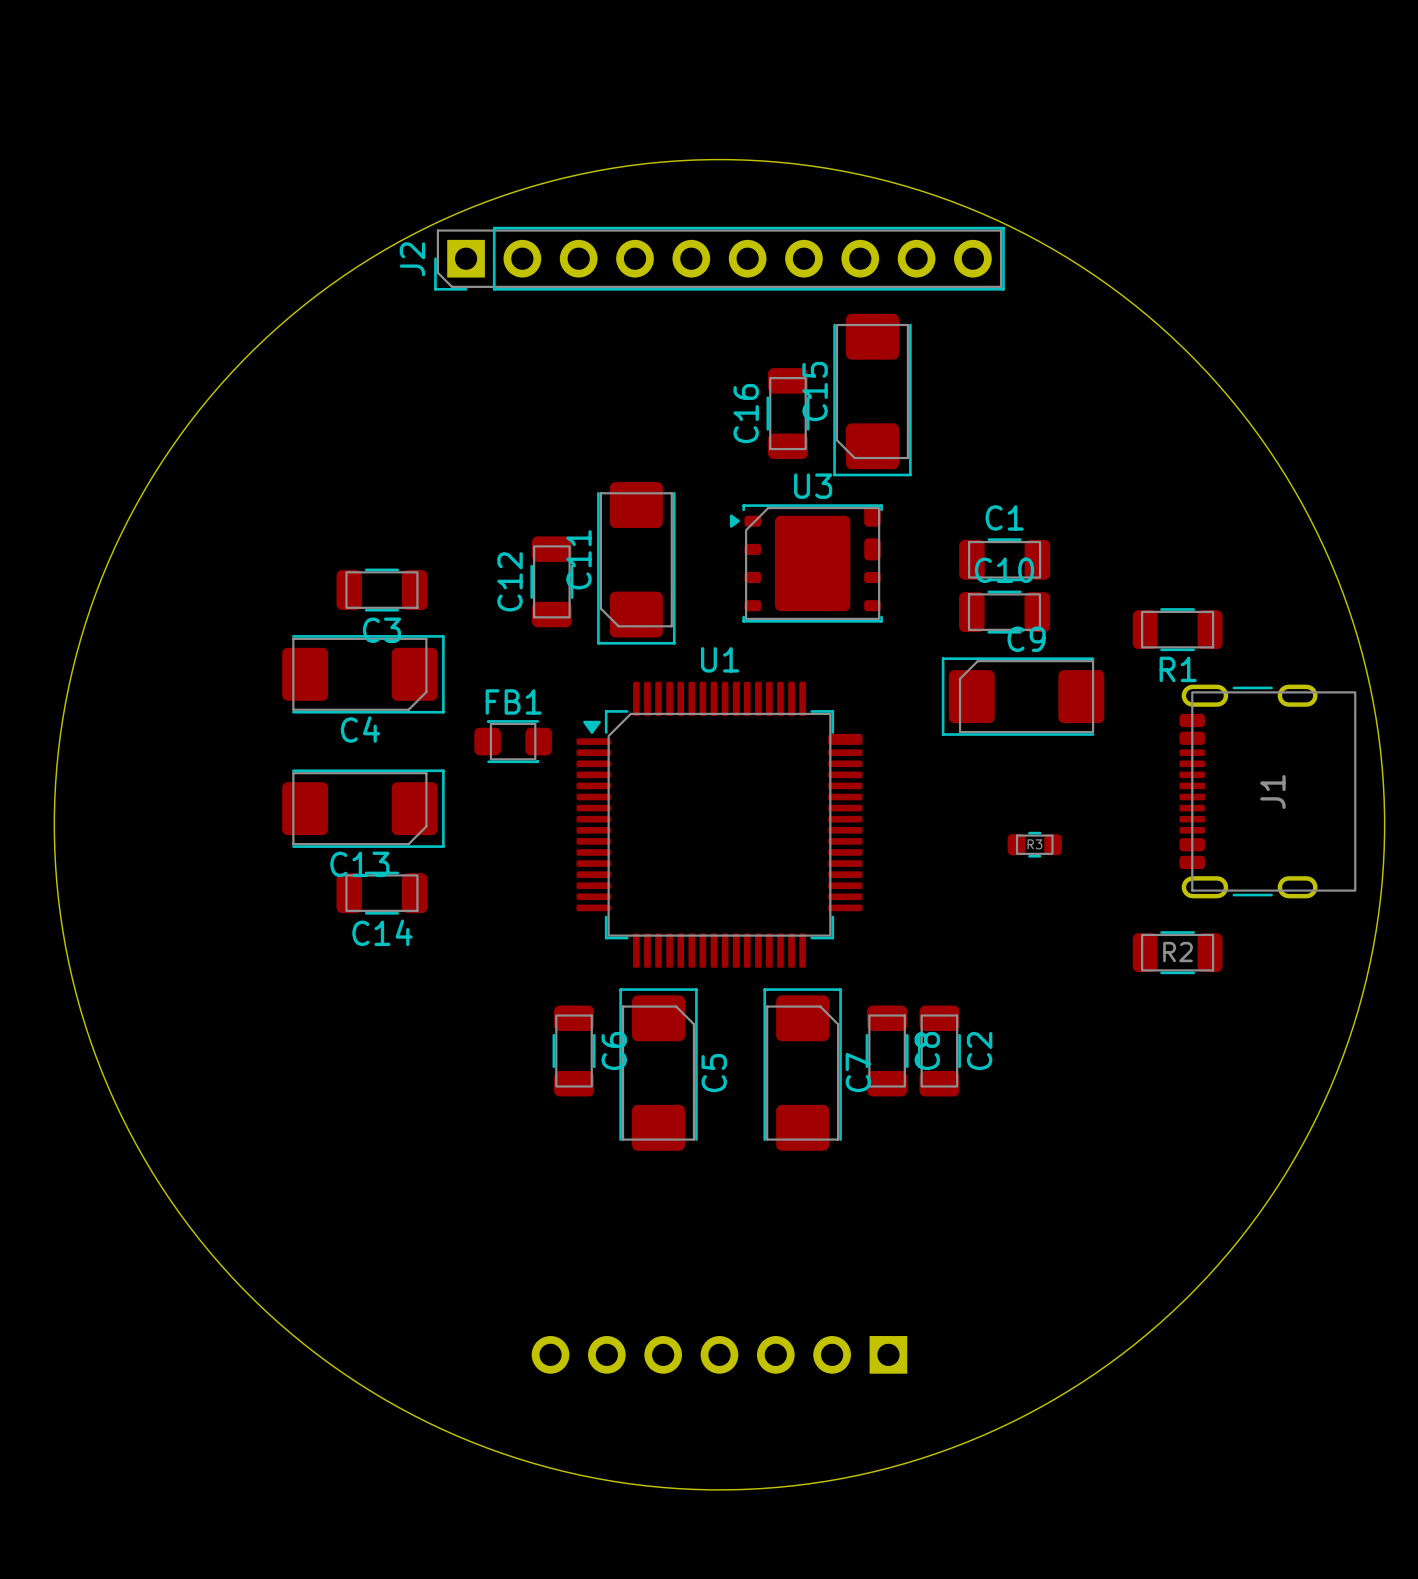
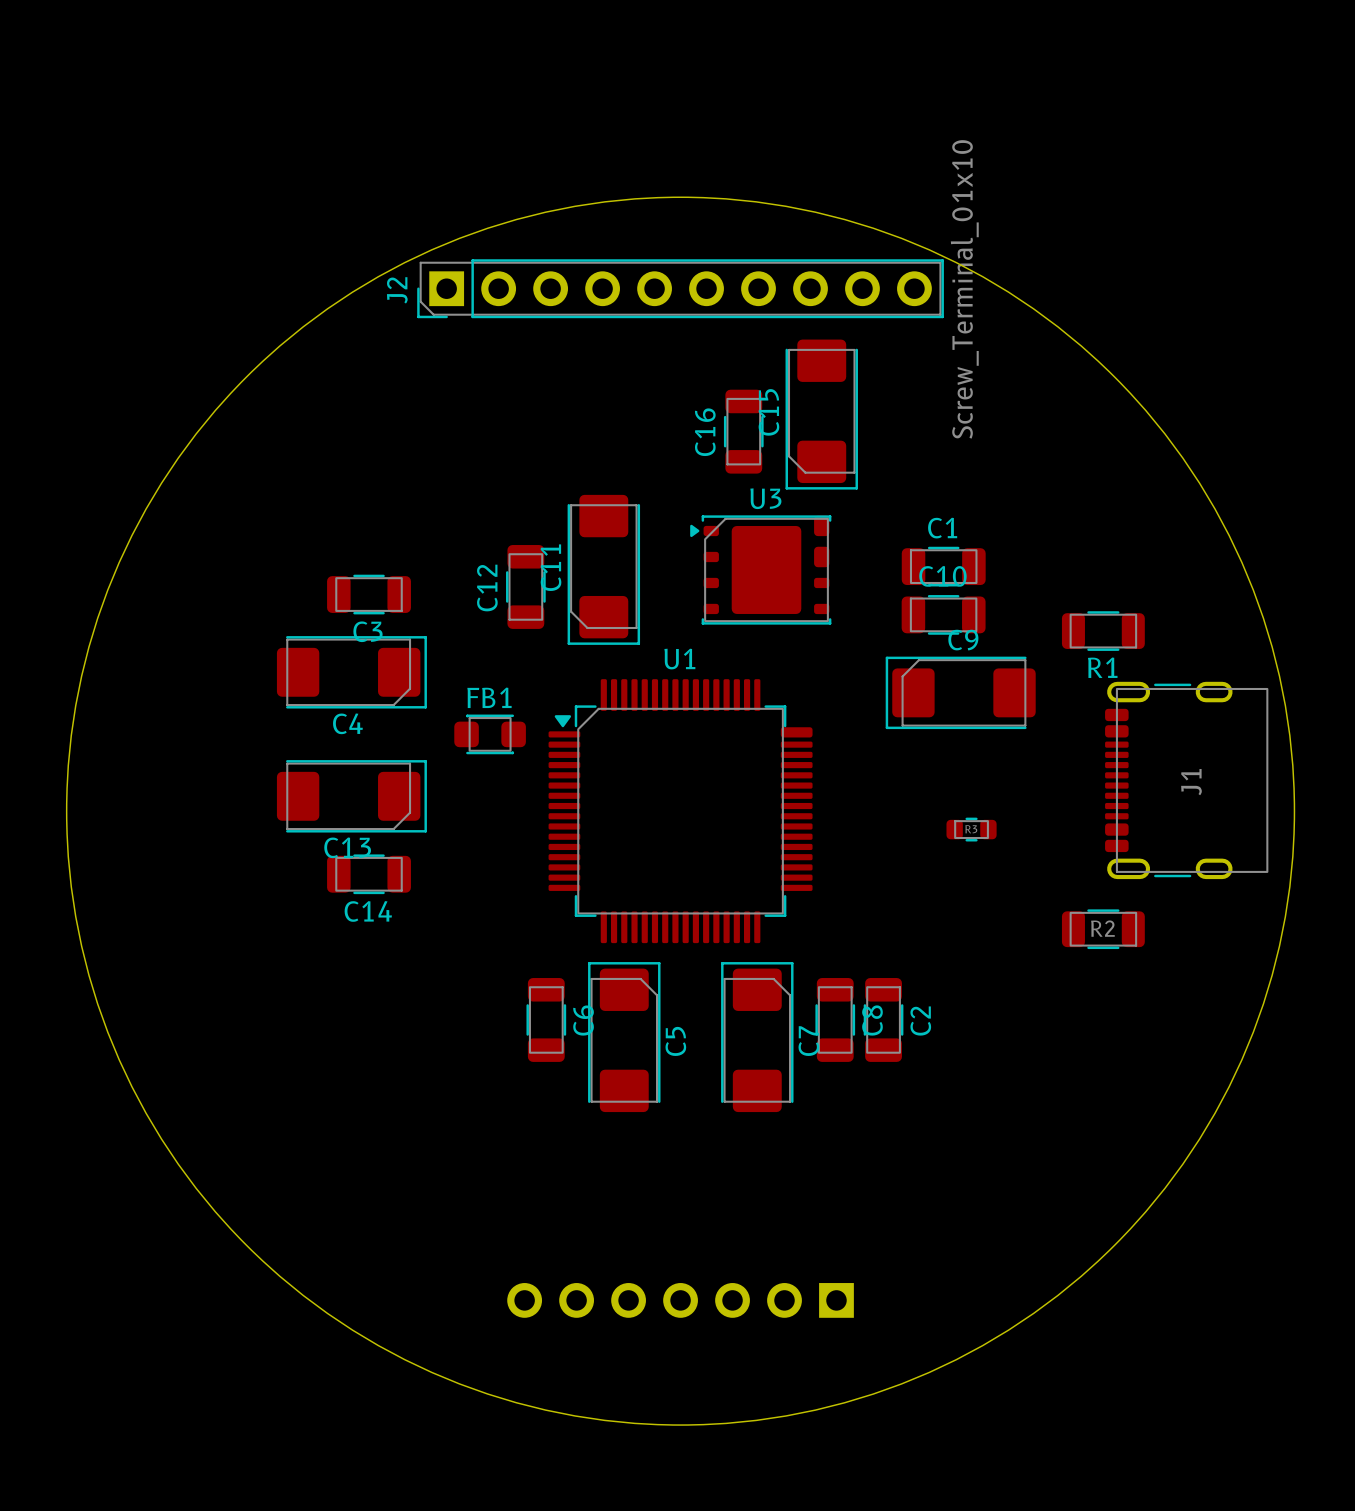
J2 value: none -> Screw_Terminal_01x10 (964, 289)

